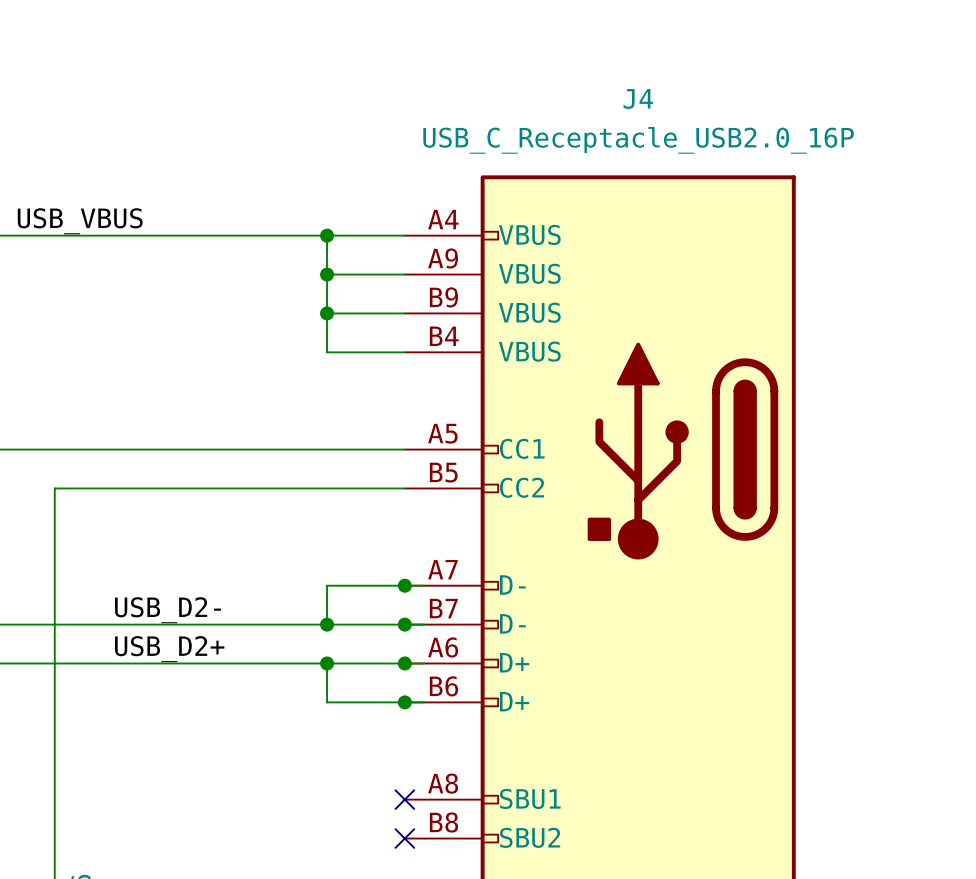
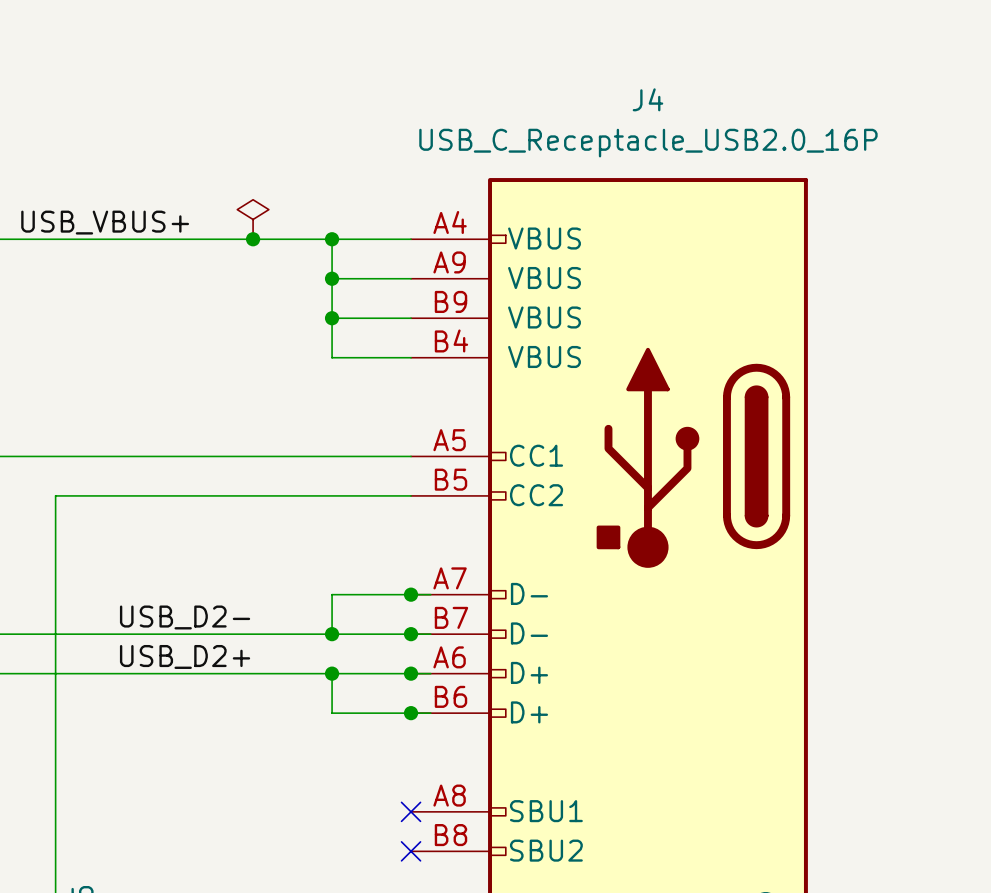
power symbol: none -> (253, 219)
label: USB_VBUS (80, 221) -> USB_VBUS+ (105, 222)
junction: none -> (253, 239)

